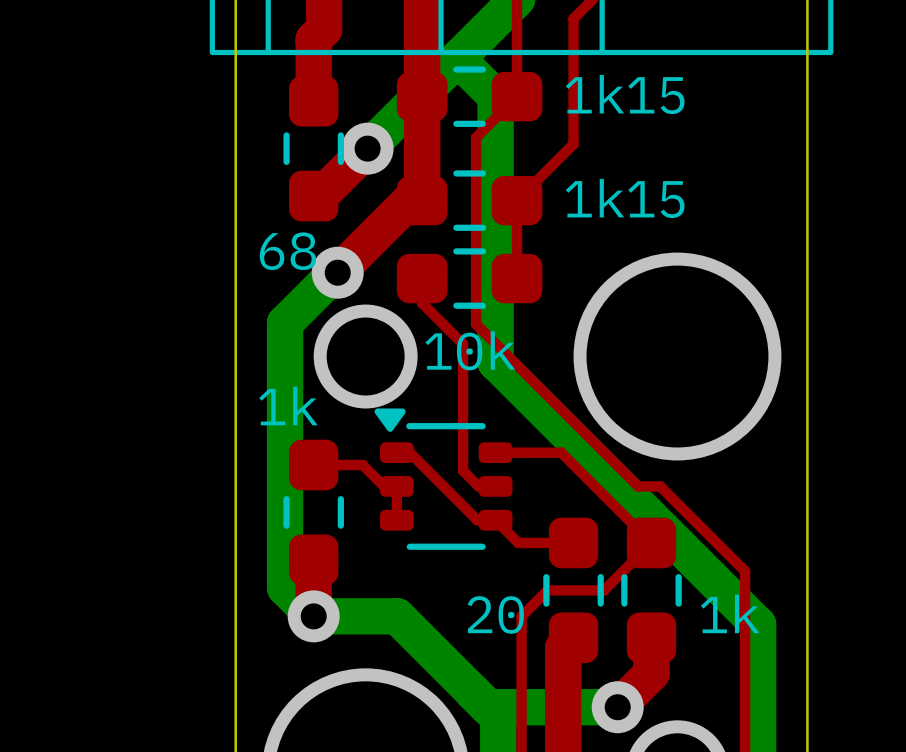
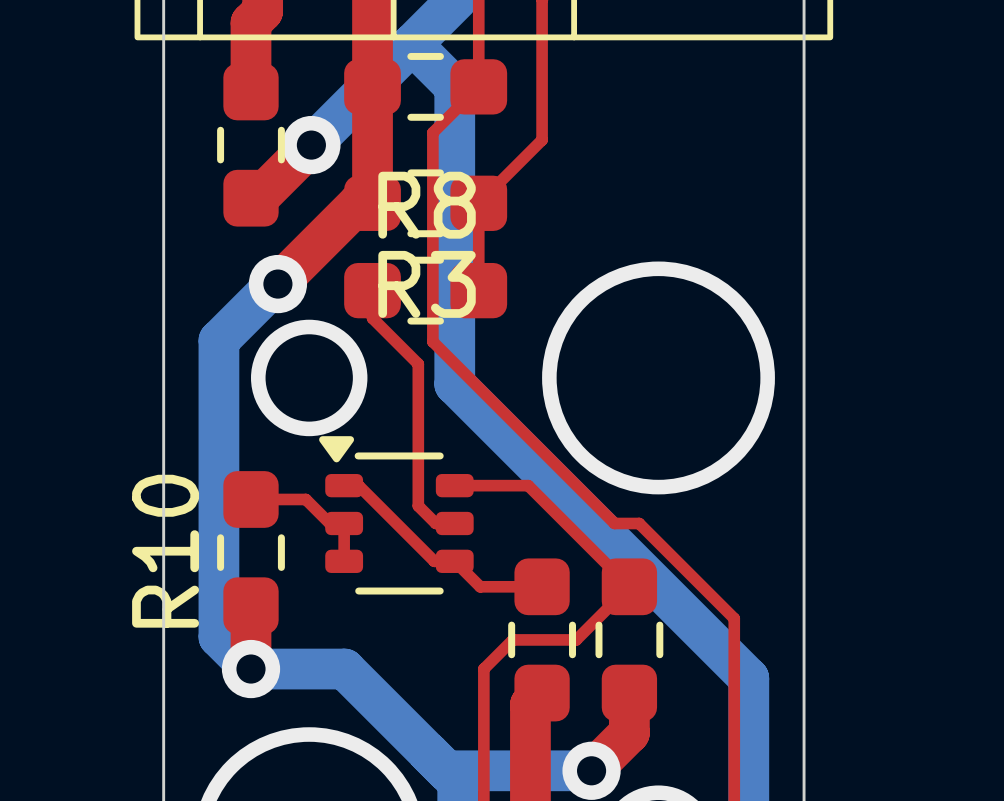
part value: 1k15 (625, 94) -> none
R3 value: 1k15 (625, 198) -> none
R8 name: none -> R8 (427, 205)
part value: 68 (287, 251) -> none
R3 name: none -> R3 (427, 284)
R8 value: 10k (470, 350) -> none
R10 value: 1k (288, 406) -> none
R10 name: none -> R10 (165, 551)
part value: 1k (730, 613) -> none
part value: 20 (495, 615) -> none

